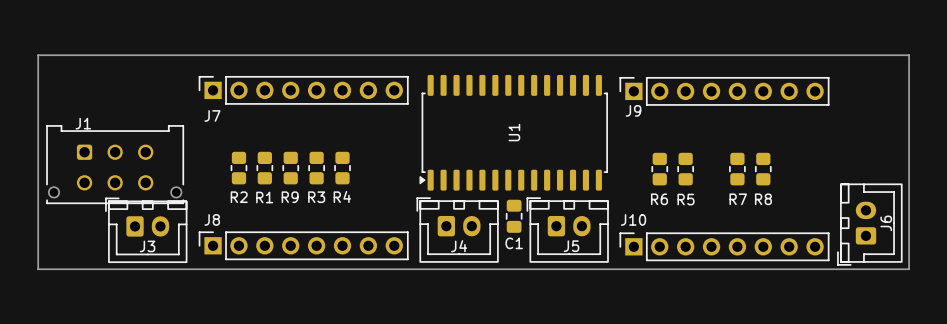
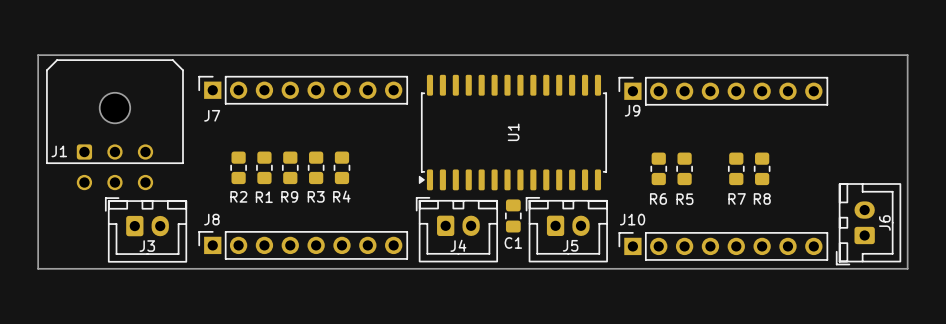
J1 name position: J1 (83, 123) -> J1 (59, 151)
J1 footprint: [46, 125, 184, 204] -> [46, 59, 184, 191]

